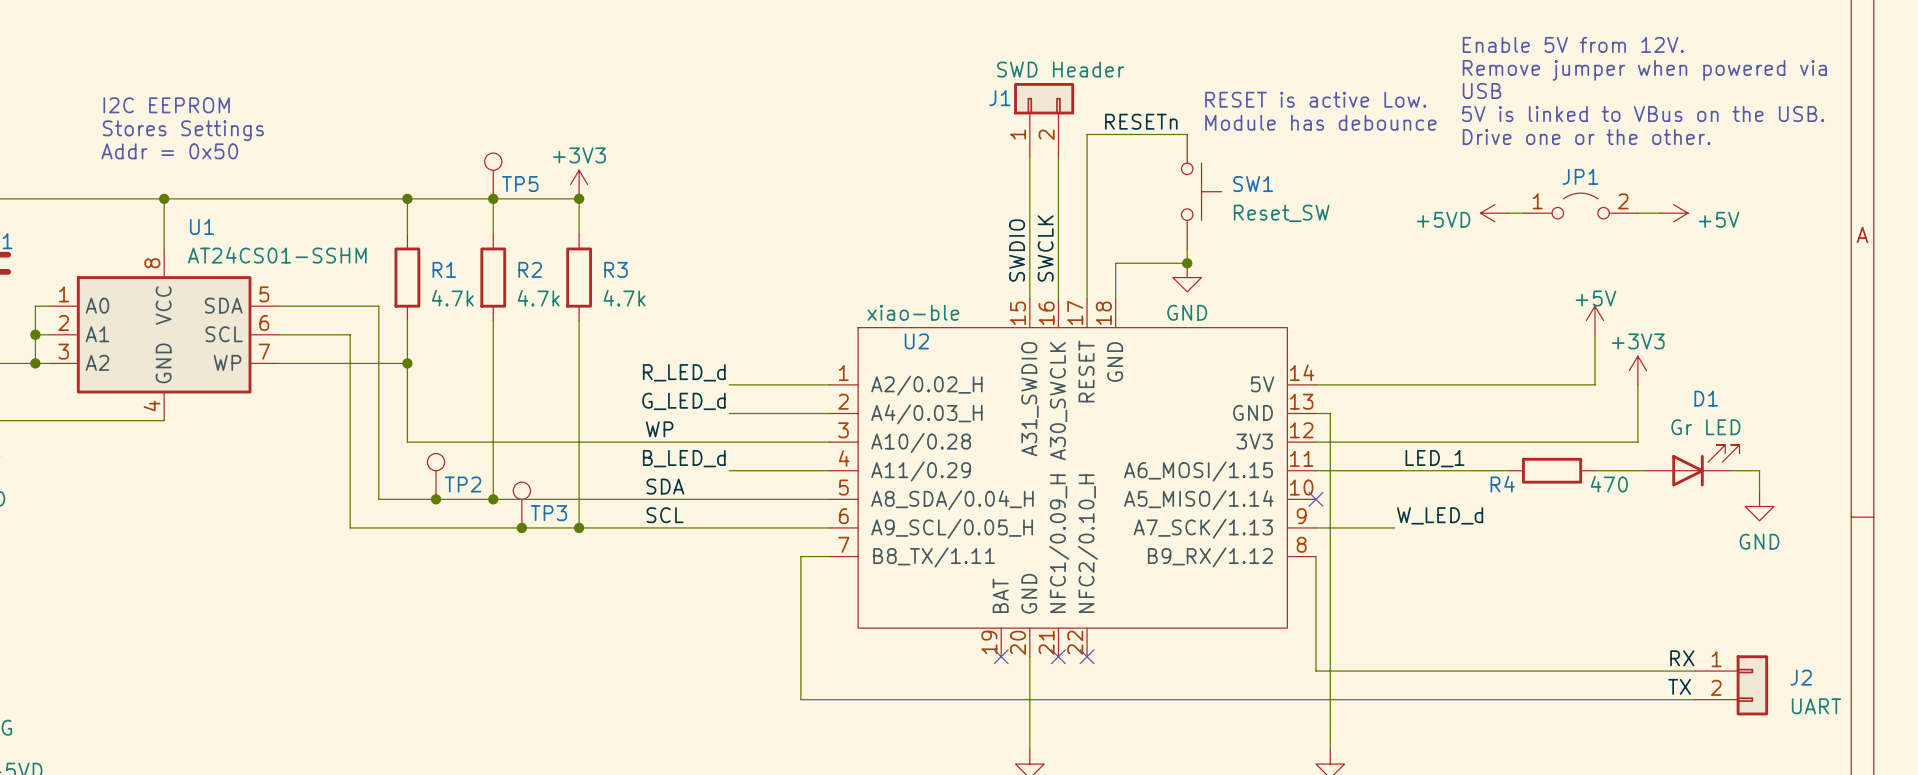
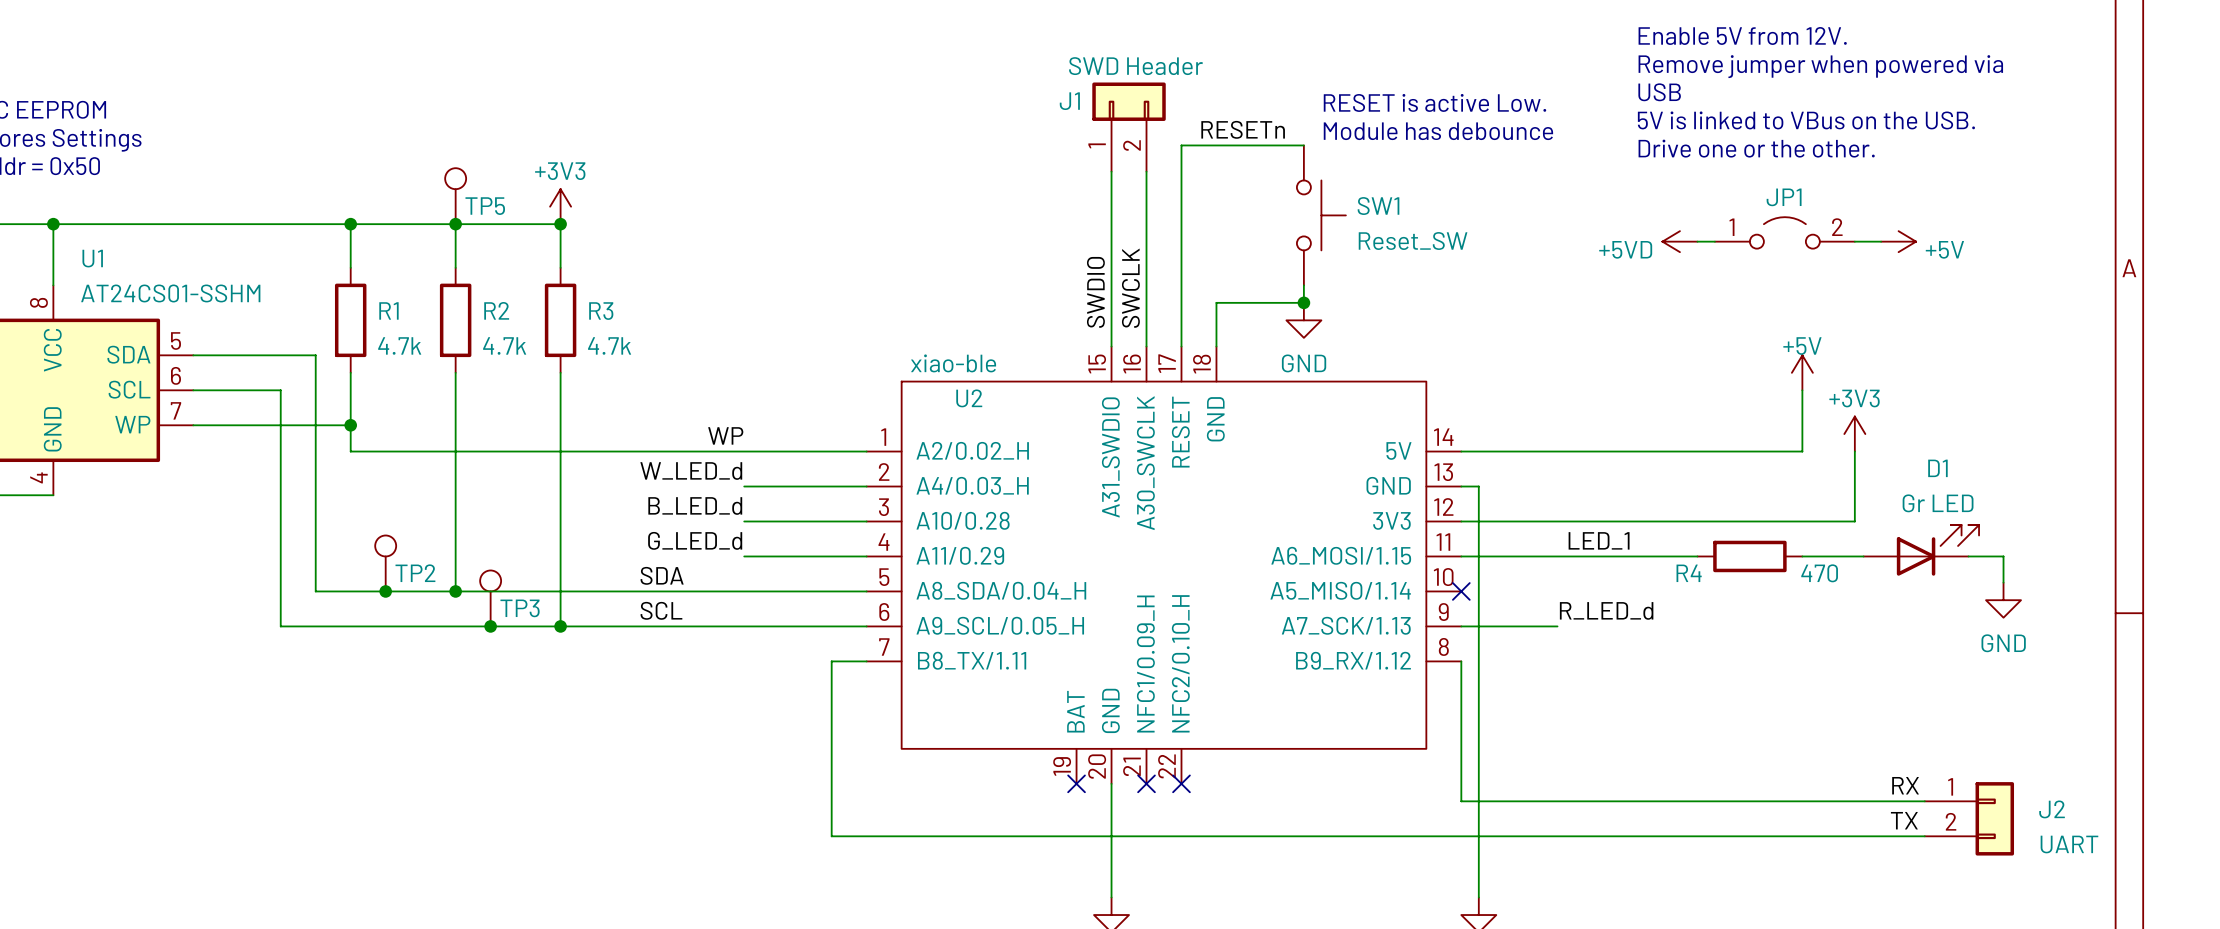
label: R_LED_d (684, 372) -> WP (725, 435)
wire: (407, 384) (407, 442) (729, 442) -> (350, 451) (744, 451)
label: G_LED_d (683, 401) -> W_LED_d (691, 471)
label: WP (659, 429) -> none
label: none -> B_LED_d (695, 505)
label: B_LED_d (684, 458) -> G_LED_d (695, 540)
label: W_LED_d (1440, 515) -> R_LED_d (1606, 610)

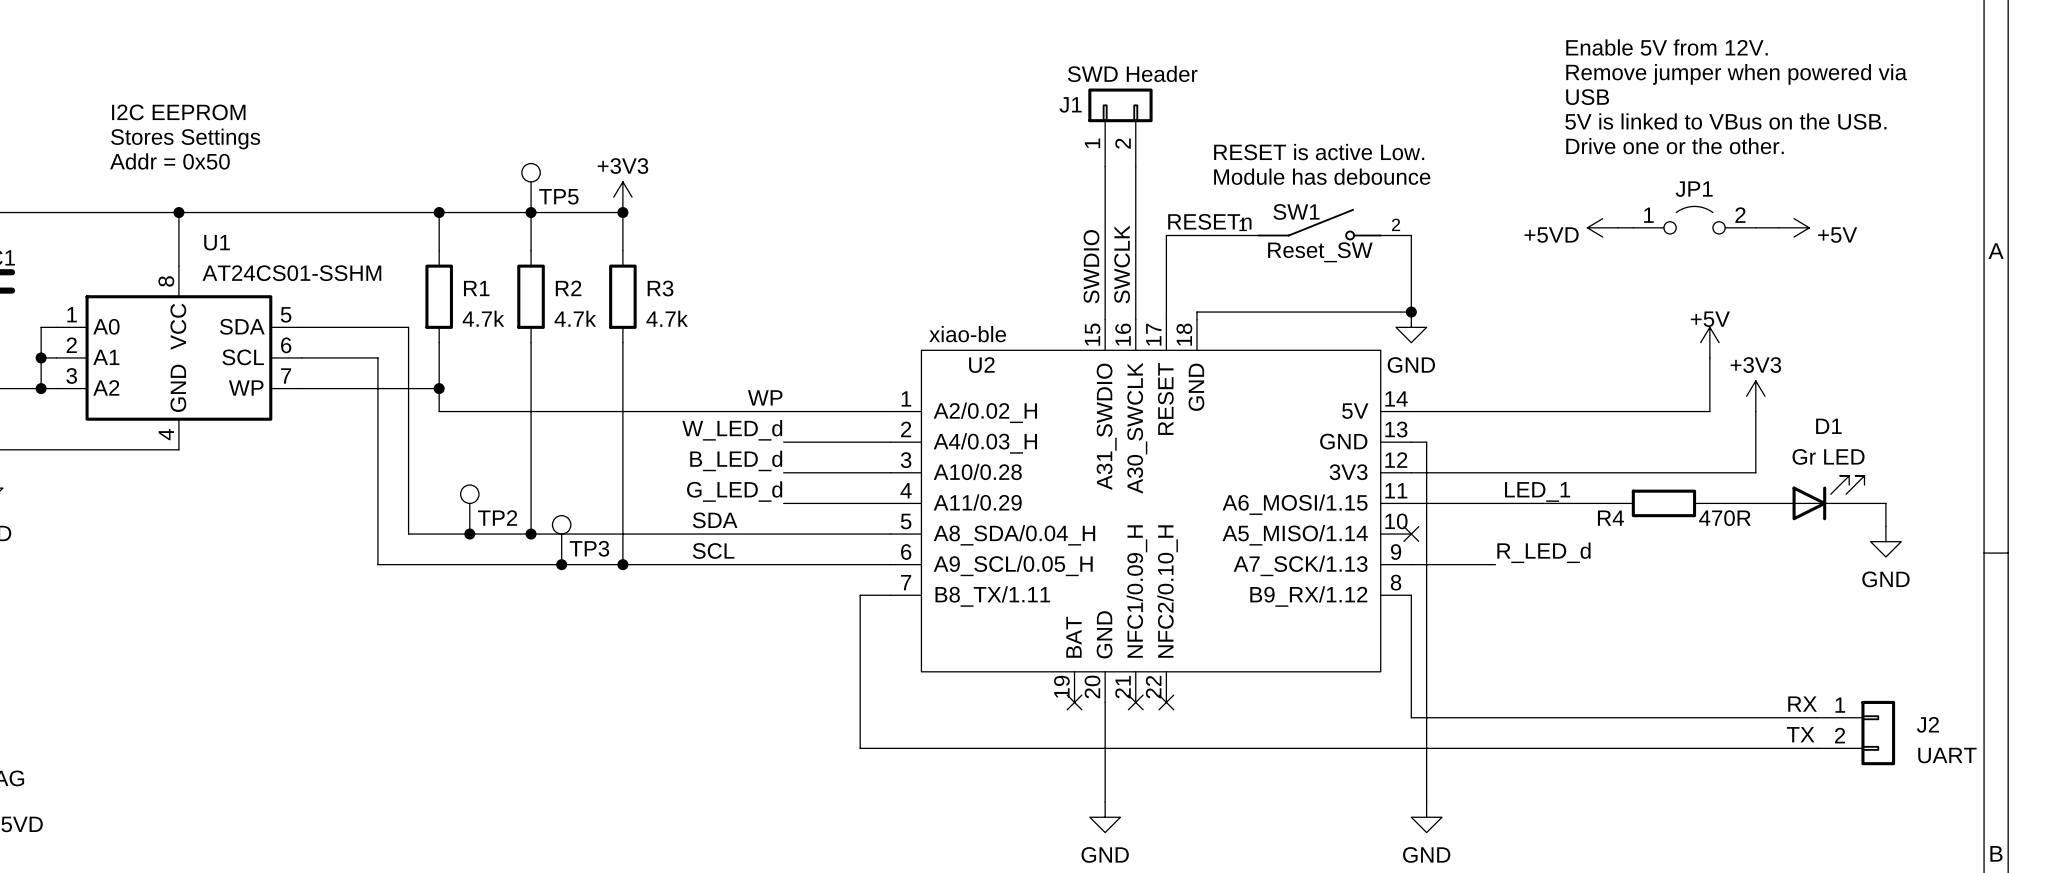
text position: RESET is active Low. (1434, 102) -> RESET is active Low. (1319, 152)
label position: RESETn (1243, 129) -> RESETn (1209, 221)
text position: Module has debounce (1438, 131) -> Module has debounce (1322, 176)
SW1 symbol: [1296, 145, 1346, 286] -> [1227, 208, 1412, 241]
wire: (1303, 145) (1181, 145) (1181, 250) -> (1227, 235) (1166, 235)
SW1 name position: SW1 (1378, 206) -> SW1 (1296, 211)
SW1 value position: Reset_SW (1413, 241) -> Reset_SW (1320, 252)
wire: (1303, 285) (1303, 302) (1216, 302) (1216, 337) -> (1411, 235) (1411, 312) (1197, 312)
junction: (1303, 302) -> none
power symbol position: GND (1303, 320) -> GND (1411, 327)
junction: none -> (1411, 312)
R4 value: 470 (1819, 573) -> 470R (1724, 518)

